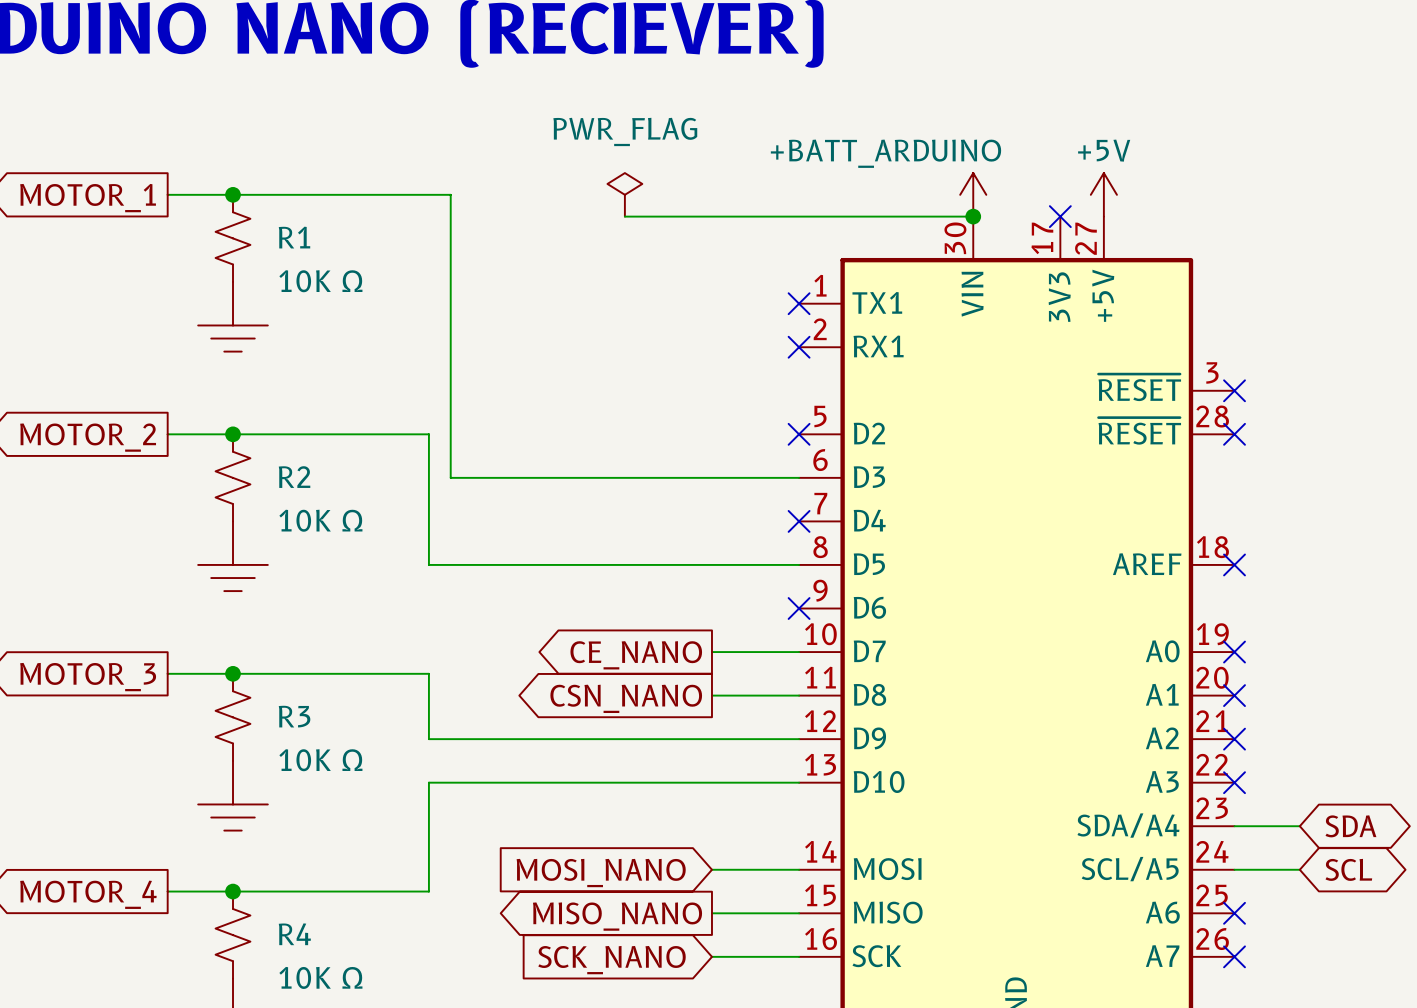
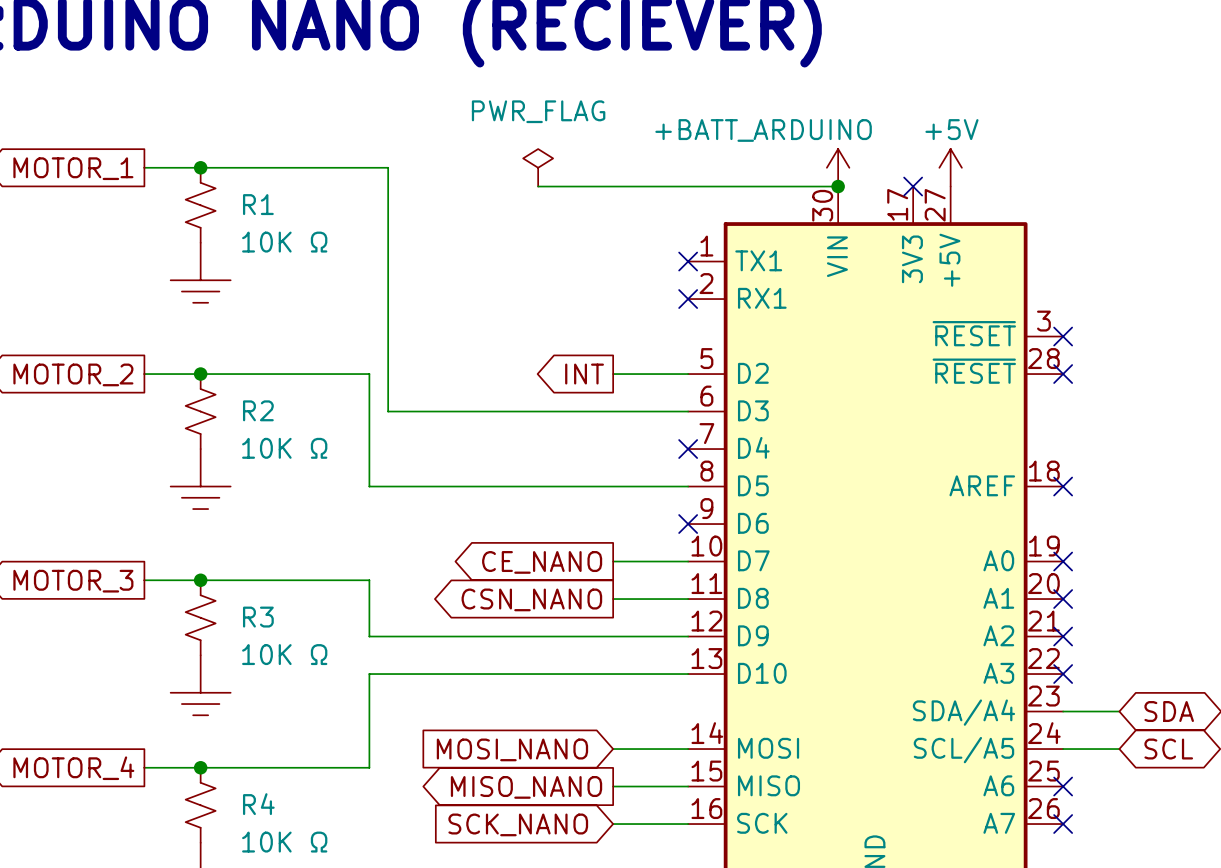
global label: none -> INT (584, 374)
wire: none -> (613, 374) (688, 374)
no-connect mark: (799, 434) -> none

